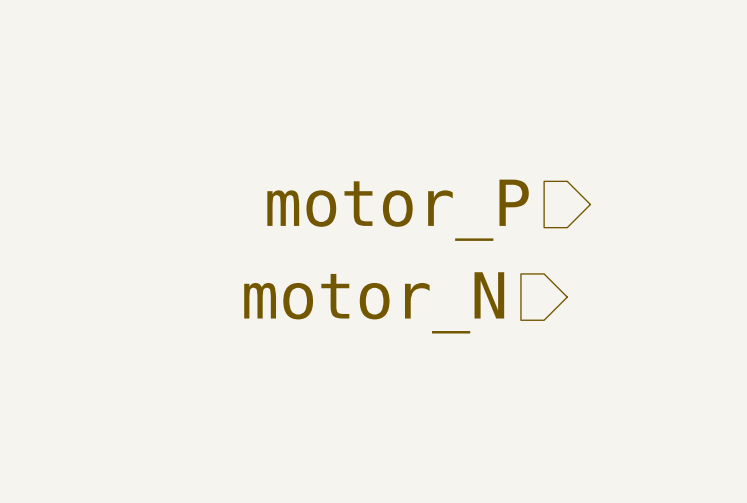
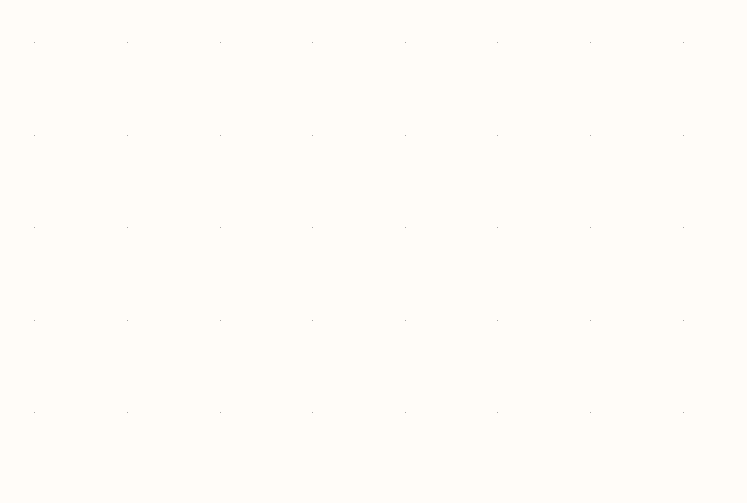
hierarchical label: motor_P (398, 210) -> none
hierarchical label: motor_N (374, 302) -> none

